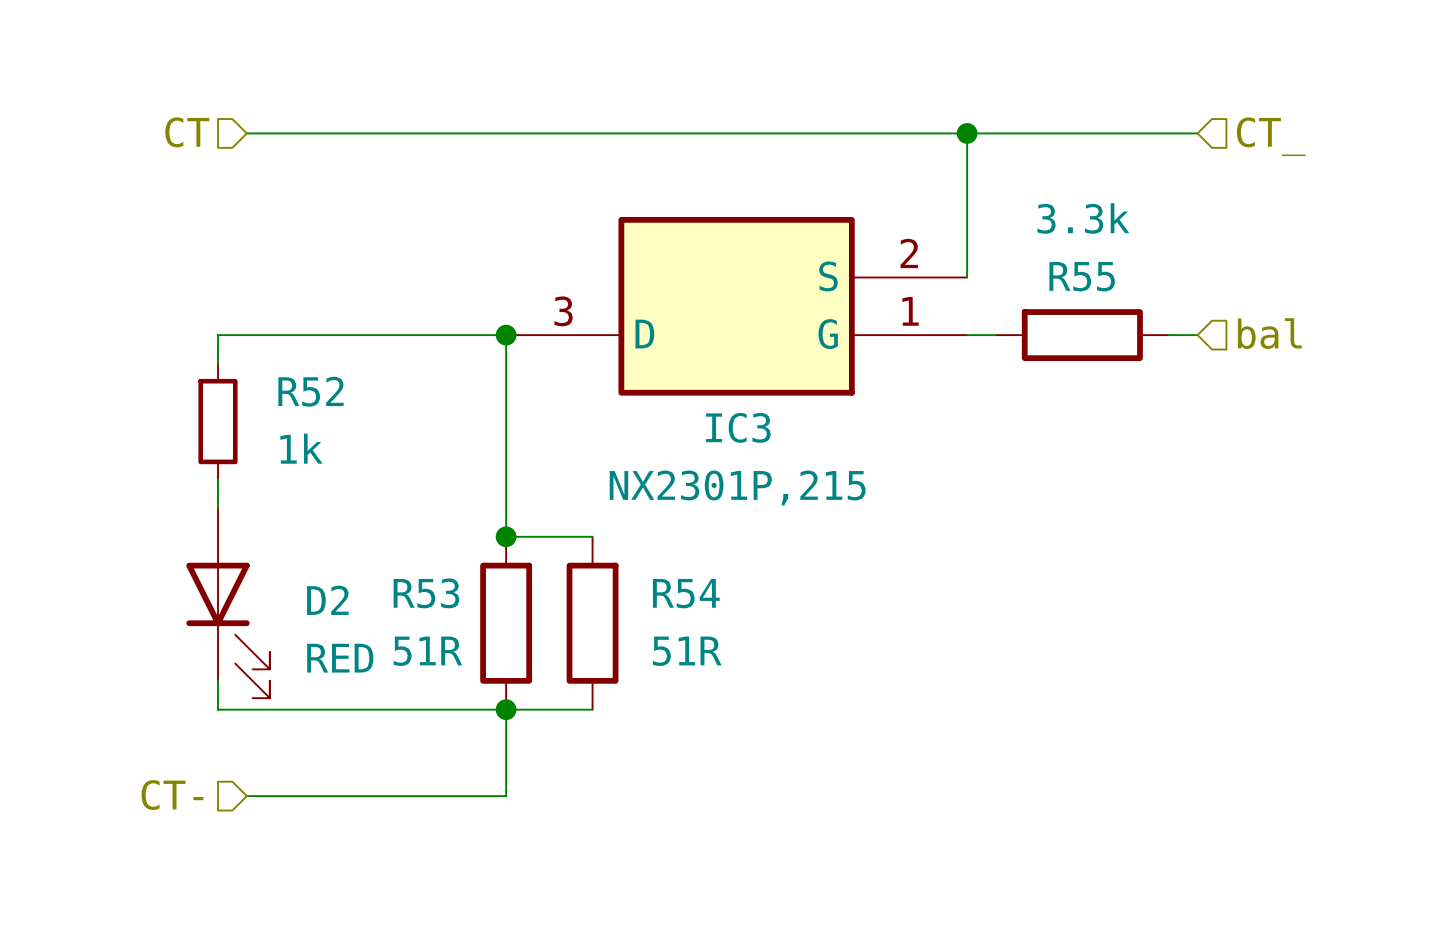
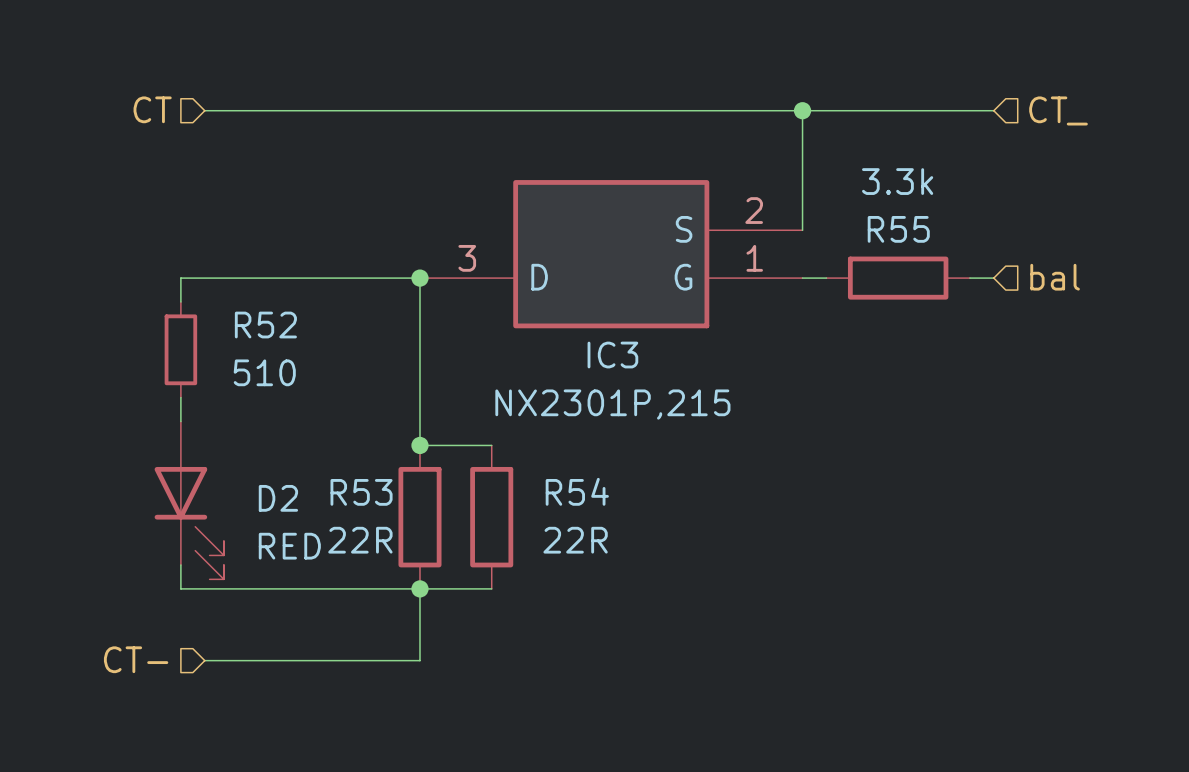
R52 value: 1k (301, 448) -> 510 (264, 372)
R53 value: 51R (427, 651) -> 22R (360, 540)
R54 value: 51R (687, 651) -> 22R (575, 540)

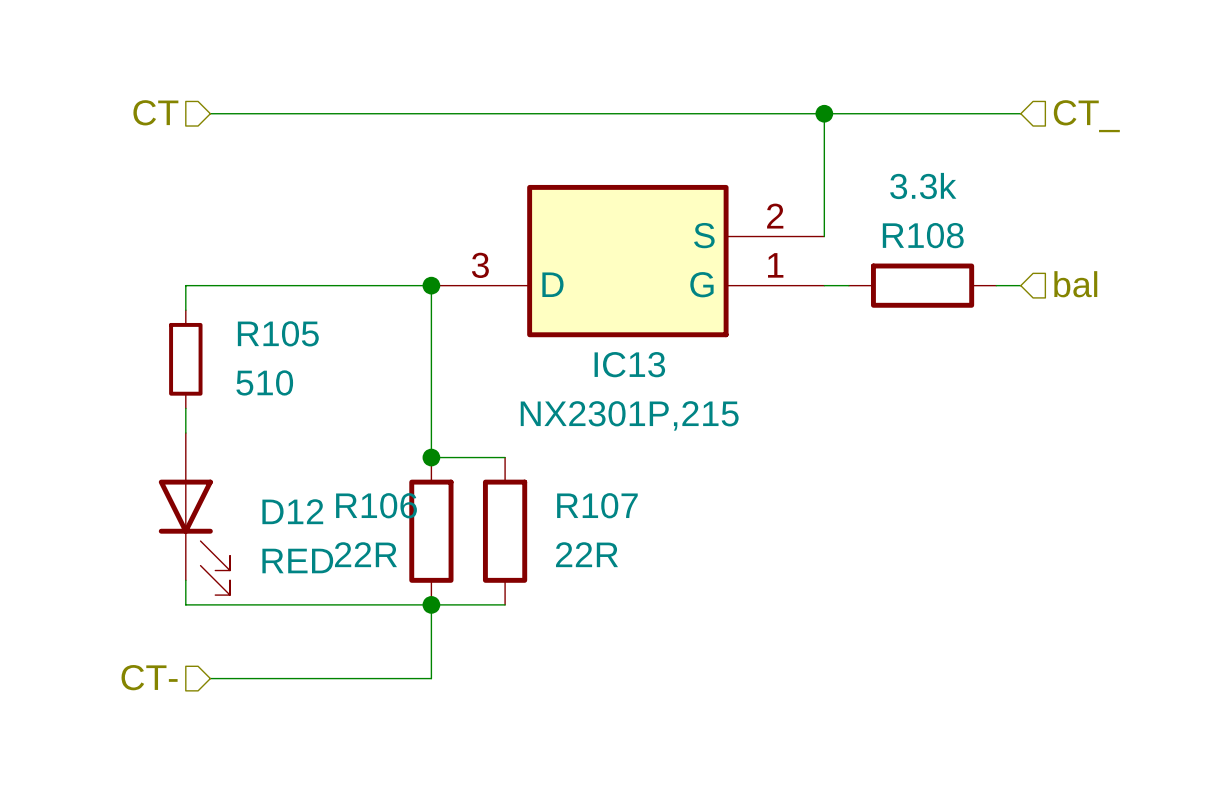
R55 name: R55 (898, 229) -> R108 (923, 235)
R52 name: R52 (265, 325) -> R105 (278, 333)
IC3 name: IC3 (612, 355) -> IC13 (629, 364)
R54 name: R54 (577, 491) -> R107 (597, 505)
R53 name: R53 (361, 492) -> R106 (376, 505)
D2 name: D2 (278, 498) -> D12 (292, 511)

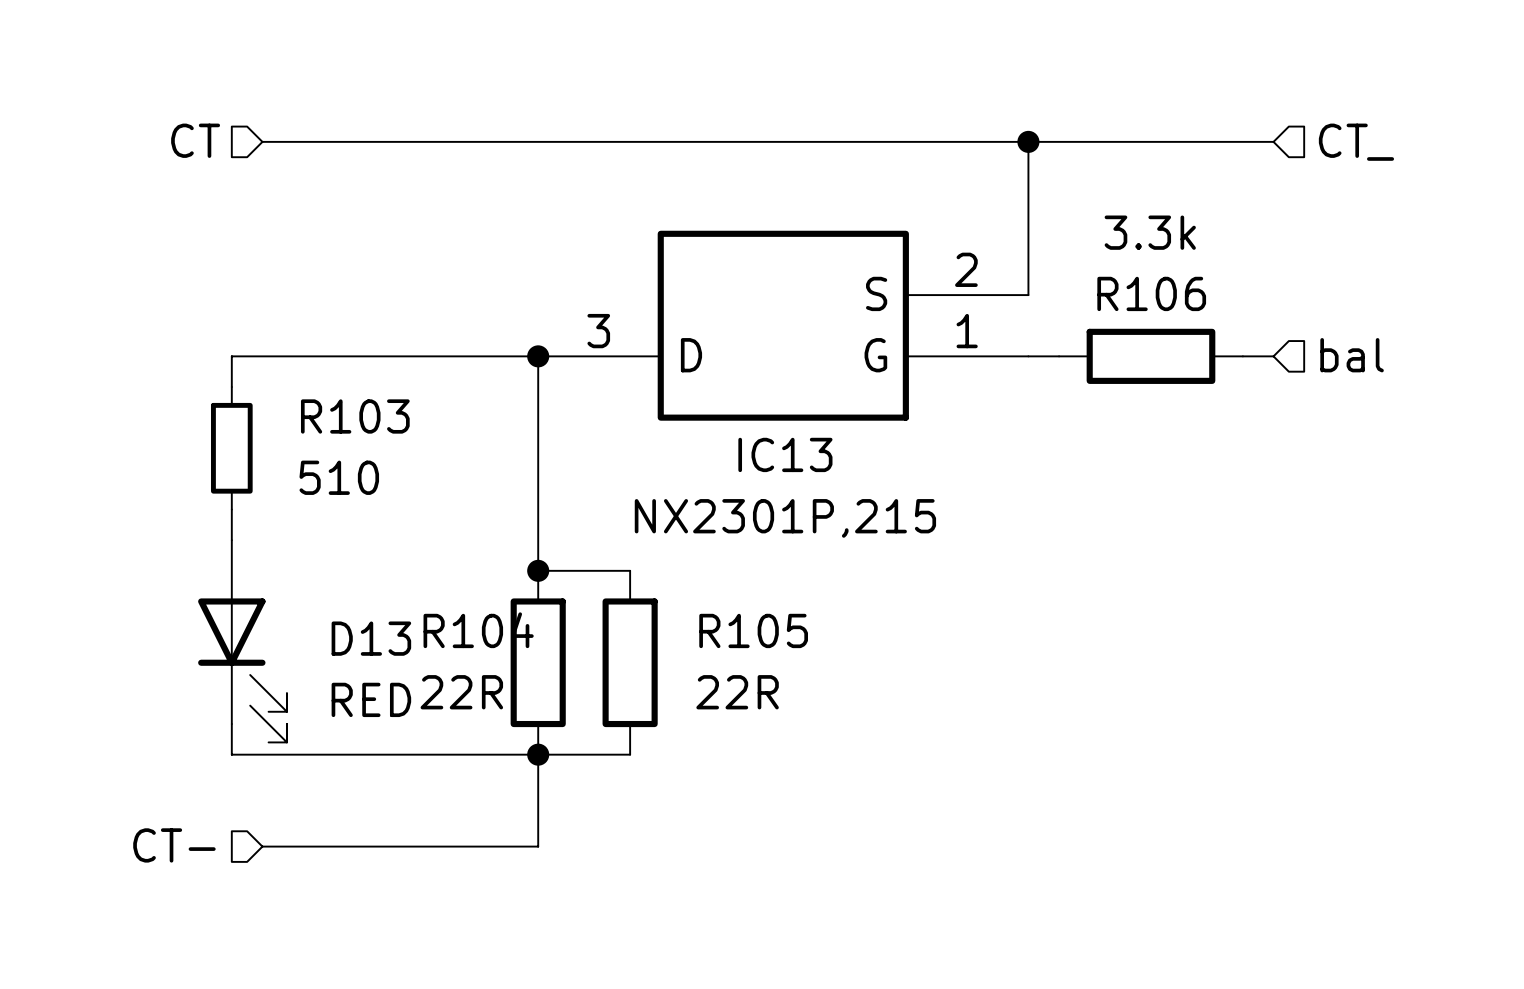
R108 name: R108 (923, 235) -> R106 (1151, 293)
R105 name: R105 (278, 333) -> R103 (355, 416)
R106 name: R106 (376, 505) -> R104 (478, 630)
R107 name: R107 (597, 505) -> R105 (753, 630)
D12 name: D12 (292, 511) -> D13 (371, 638)

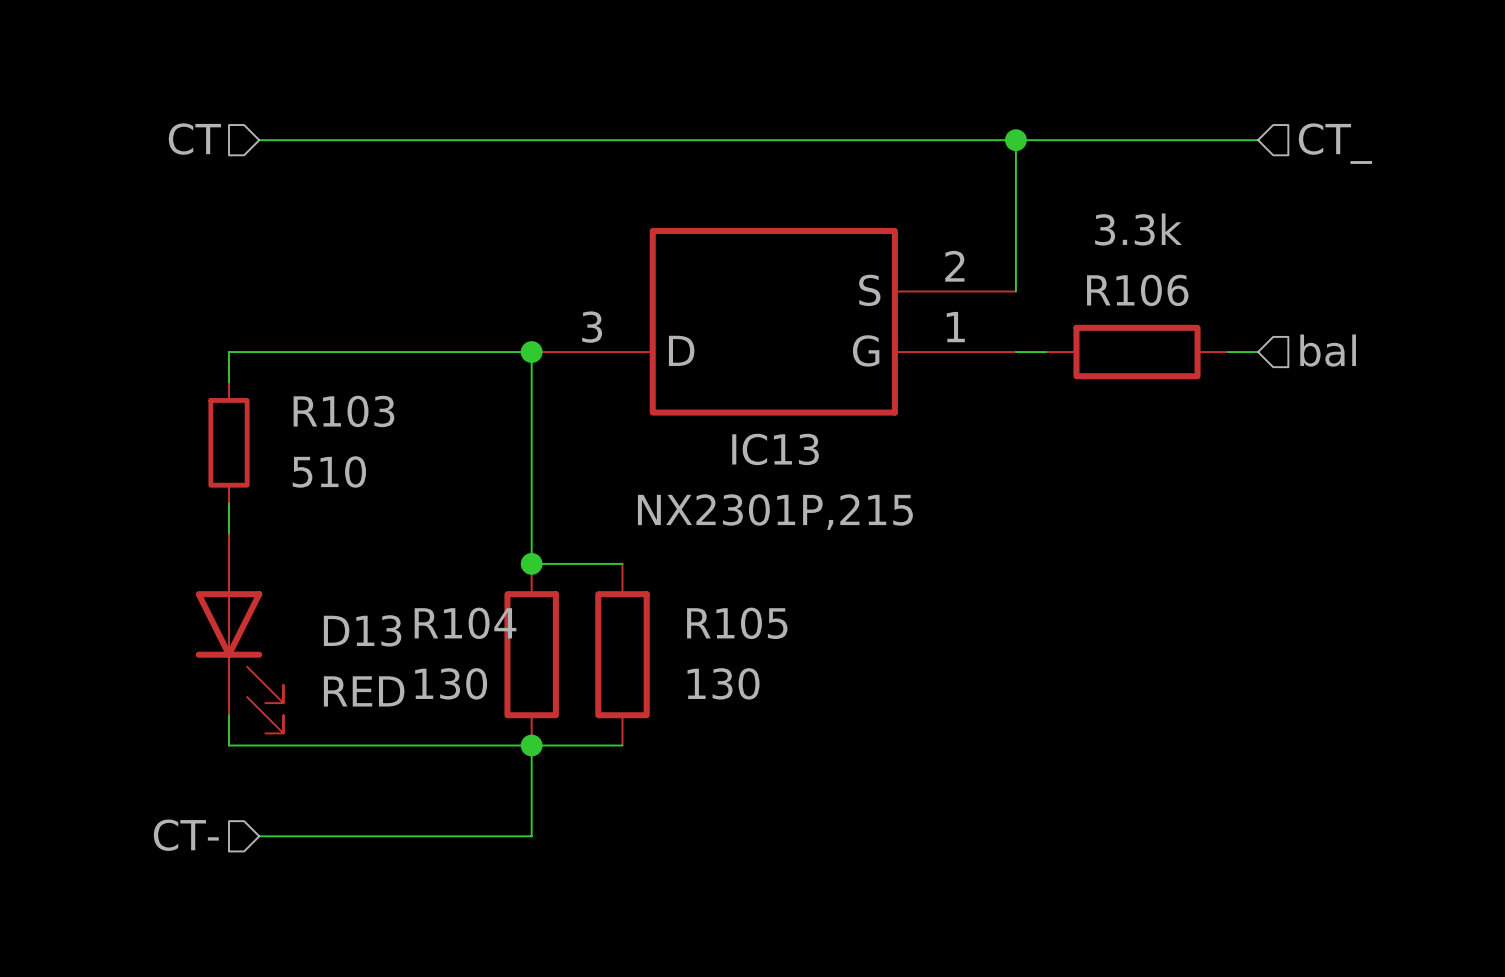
R104 value: 22R (461, 692) -> 130 (451, 683)
R105 value: 22R (737, 692) -> 130 (723, 683)

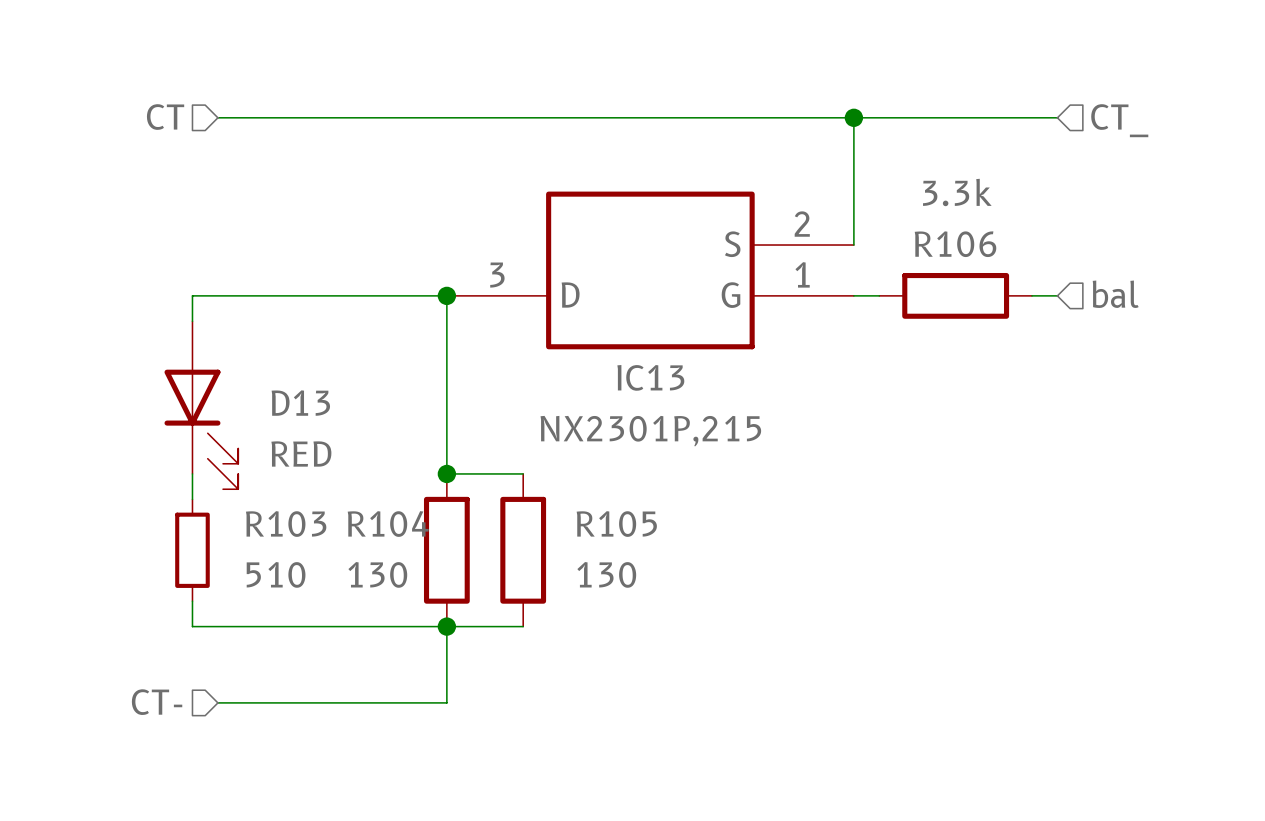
R103 position: (229, 442) -> (192, 550)
D13 position: (239, 633) -> (201, 405)

